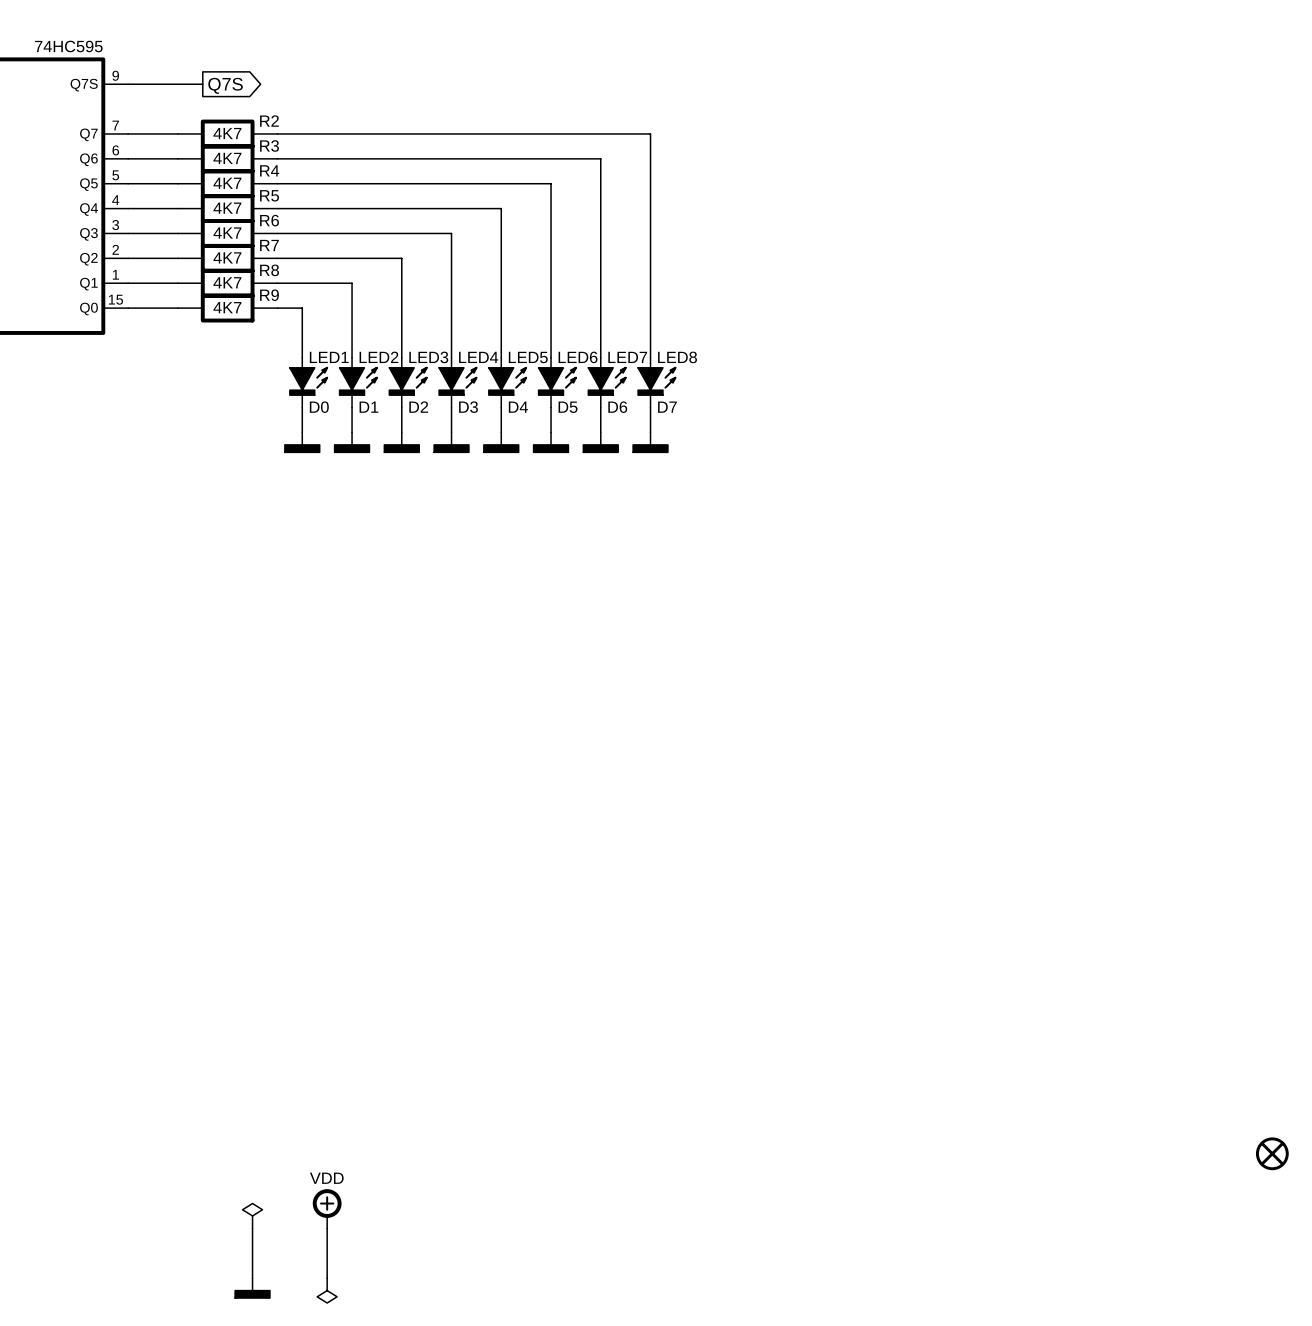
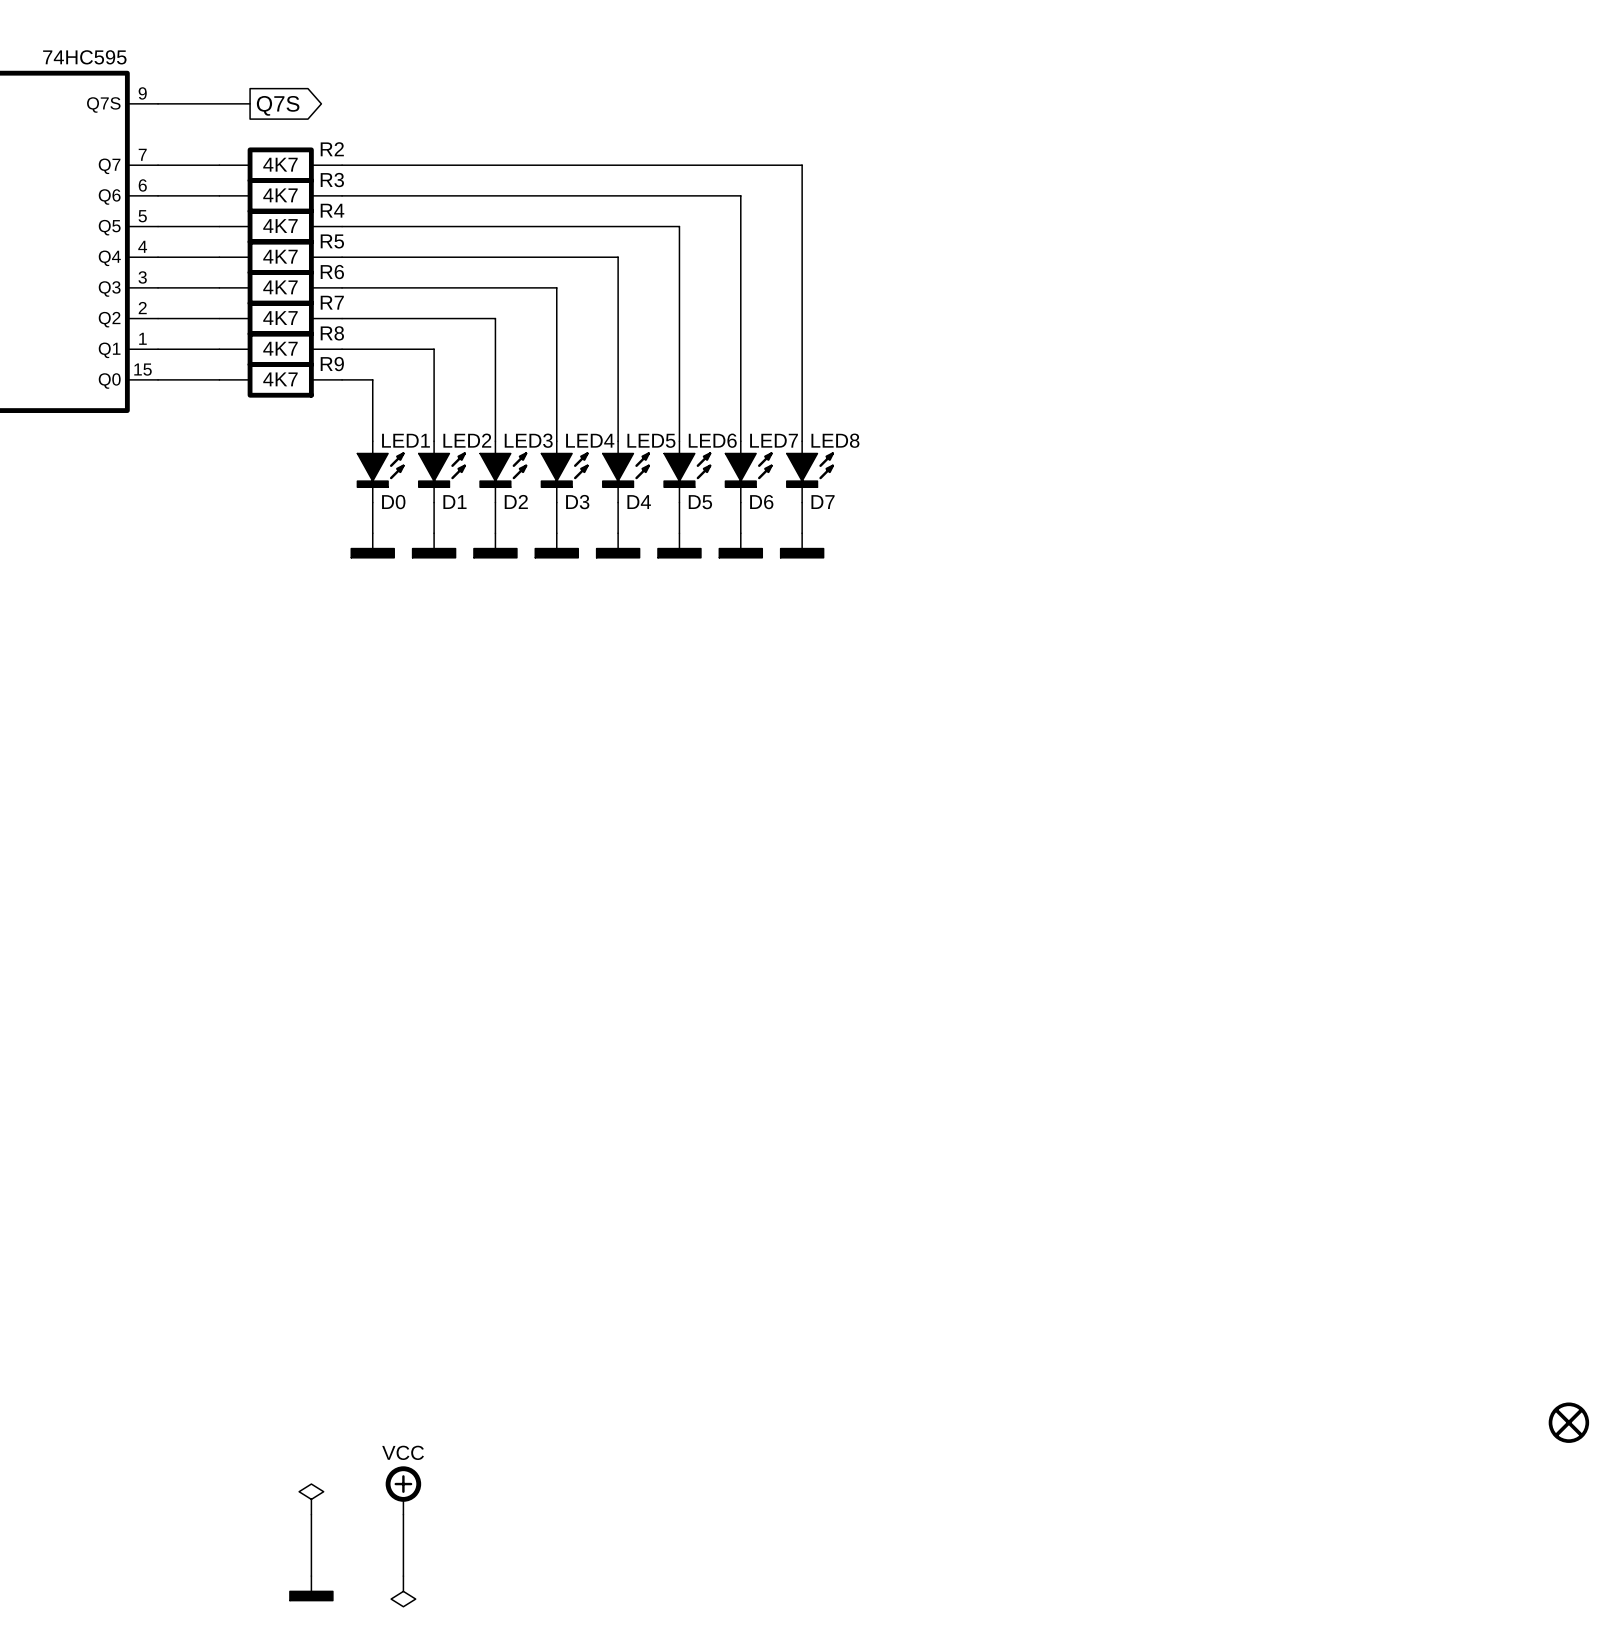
power symbol text: VDD (326, 1178) -> VCC (403, 1452)

